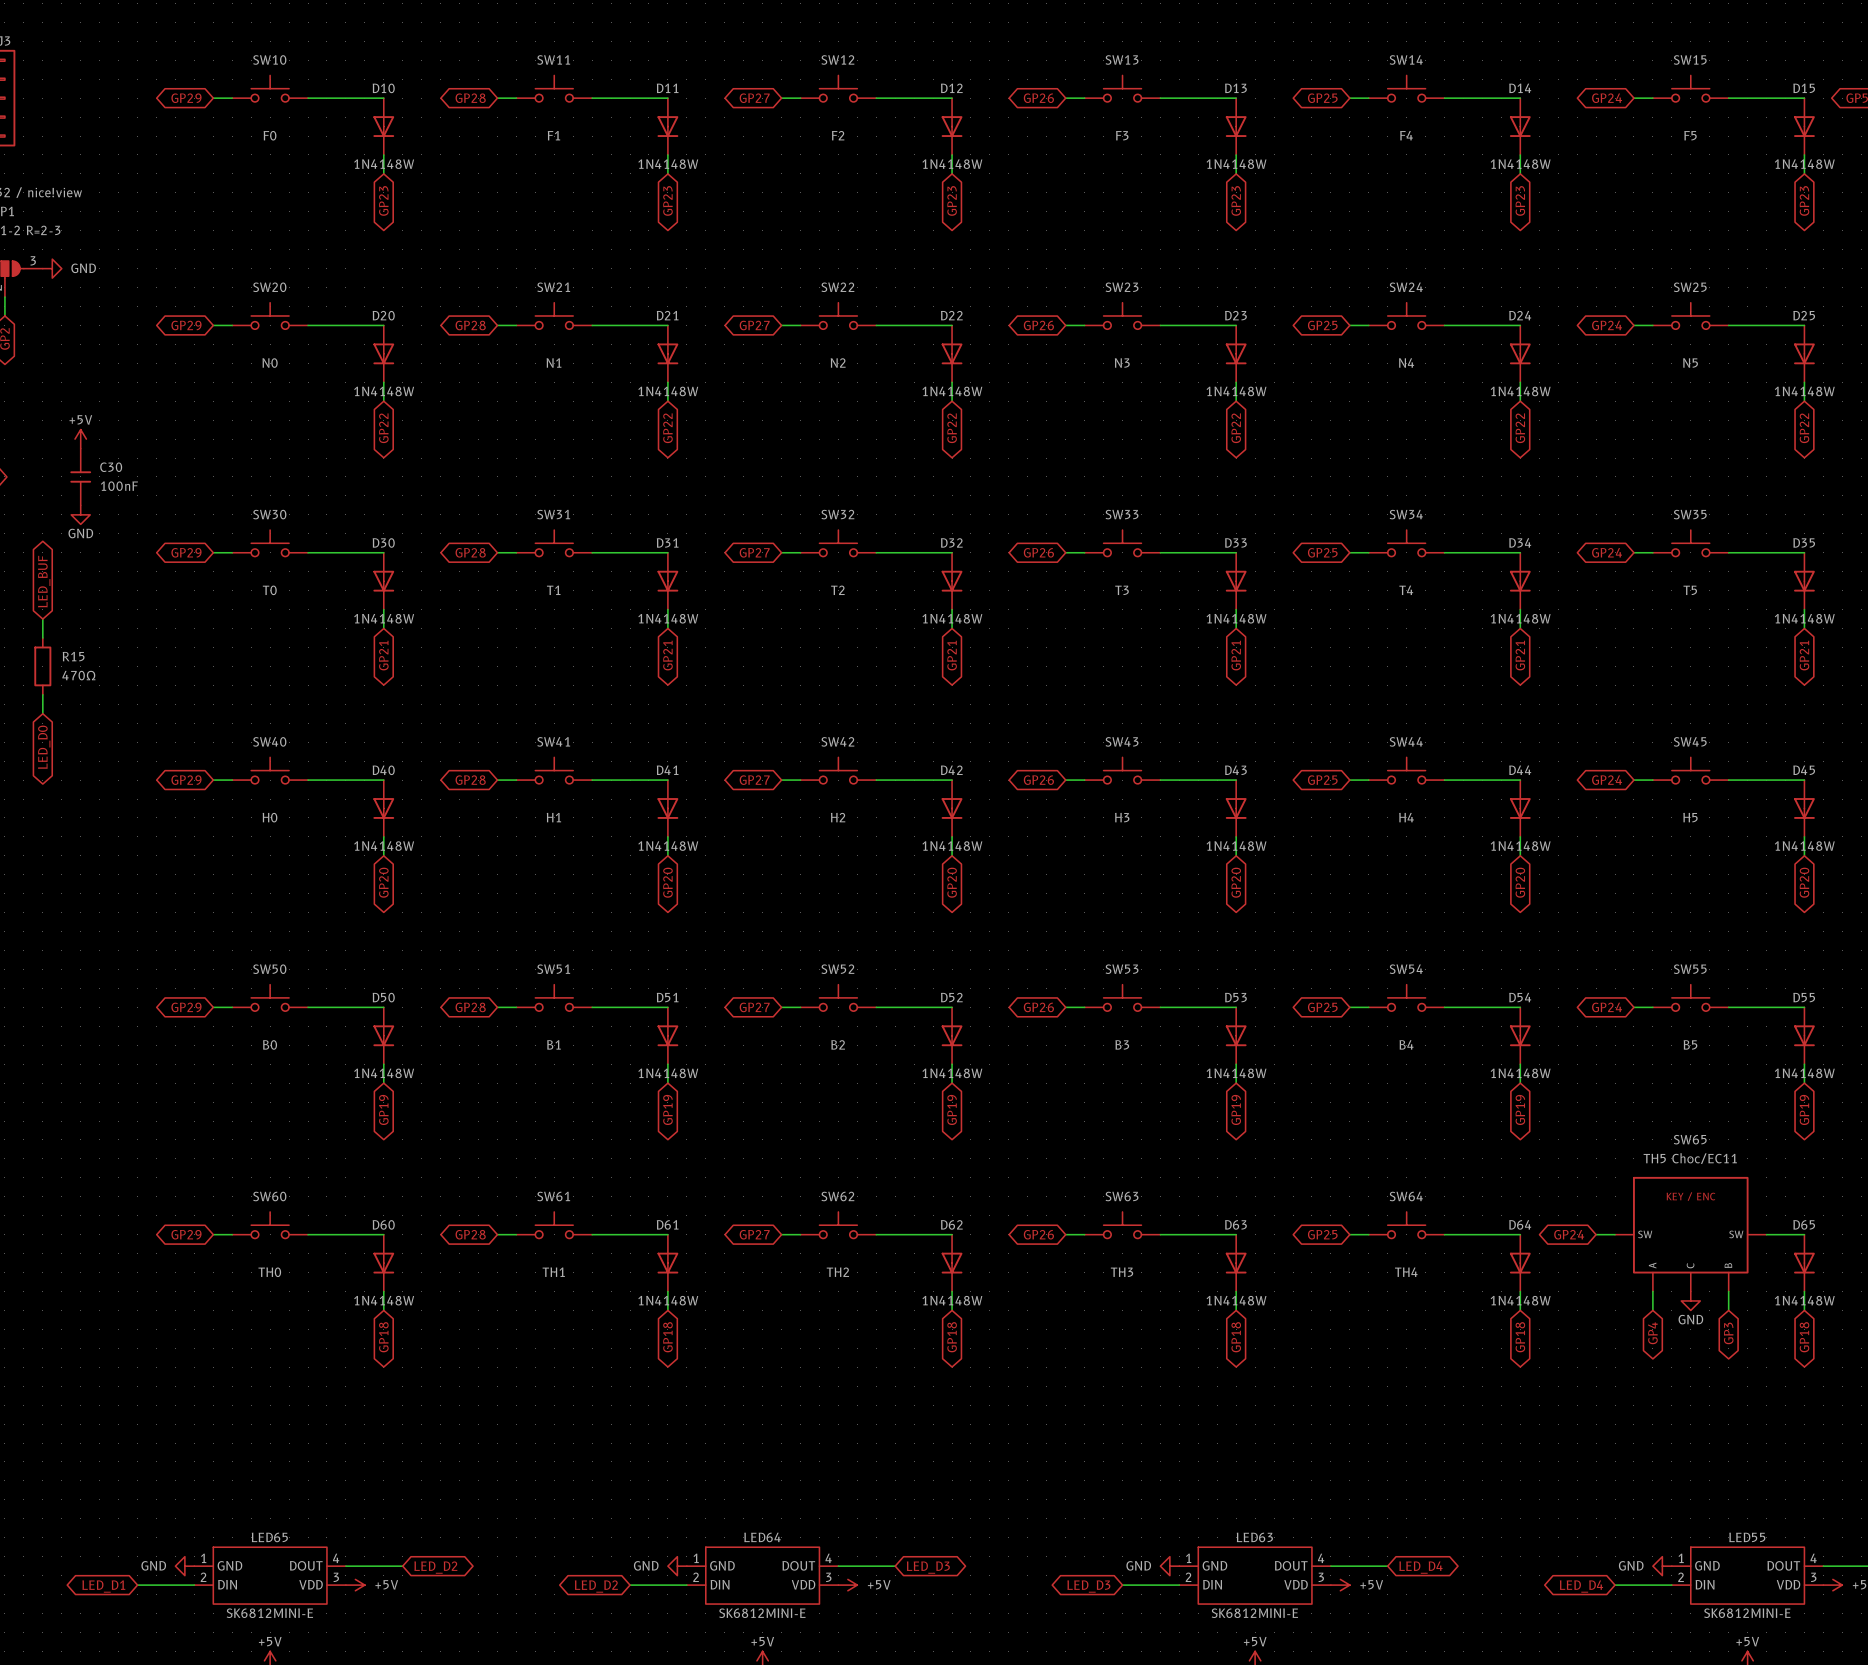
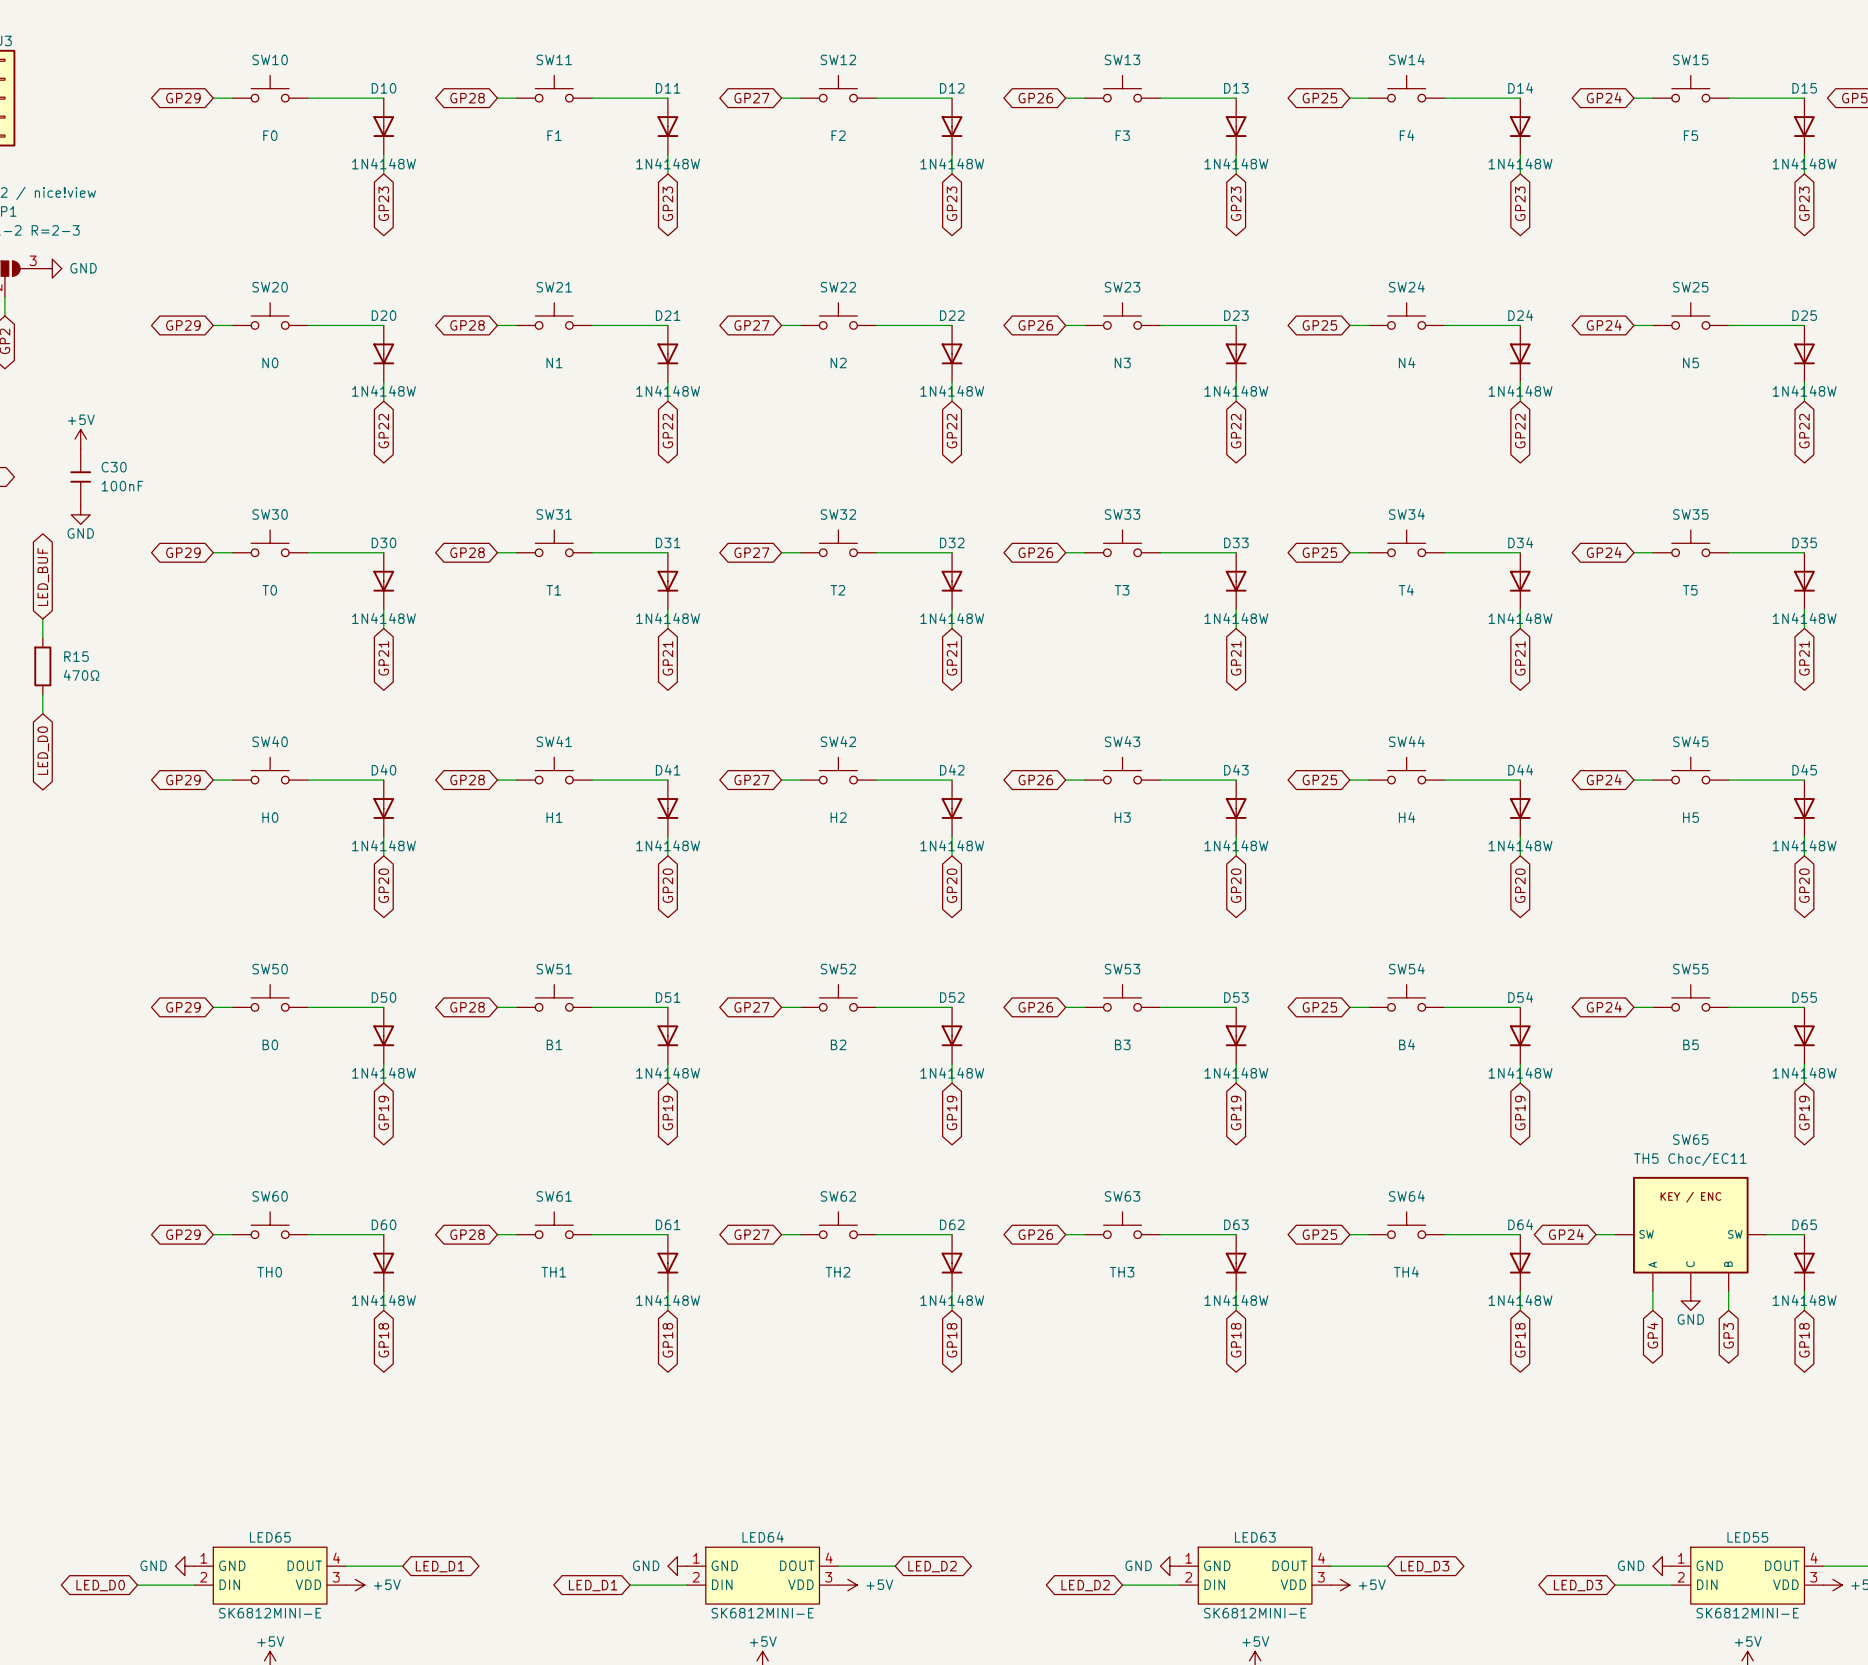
global label: LED_D2 (435, 1567) -> LED_D1 (440, 1566)
global label: LED_D3 (928, 1567) -> LED_D2 (932, 1566)
global label: LED_D4 (1420, 1567) -> LED_D3 (1425, 1566)
global label: LED_D1 (103, 1586) -> LED_D0 (100, 1585)
global label: LED_D2 (596, 1586) -> LED_D1 (593, 1585)
global label: LED_D3 (1088, 1586) -> LED_D2 (1085, 1585)
global label: LED_D4 (1581, 1586) -> LED_D3 (1578, 1585)

